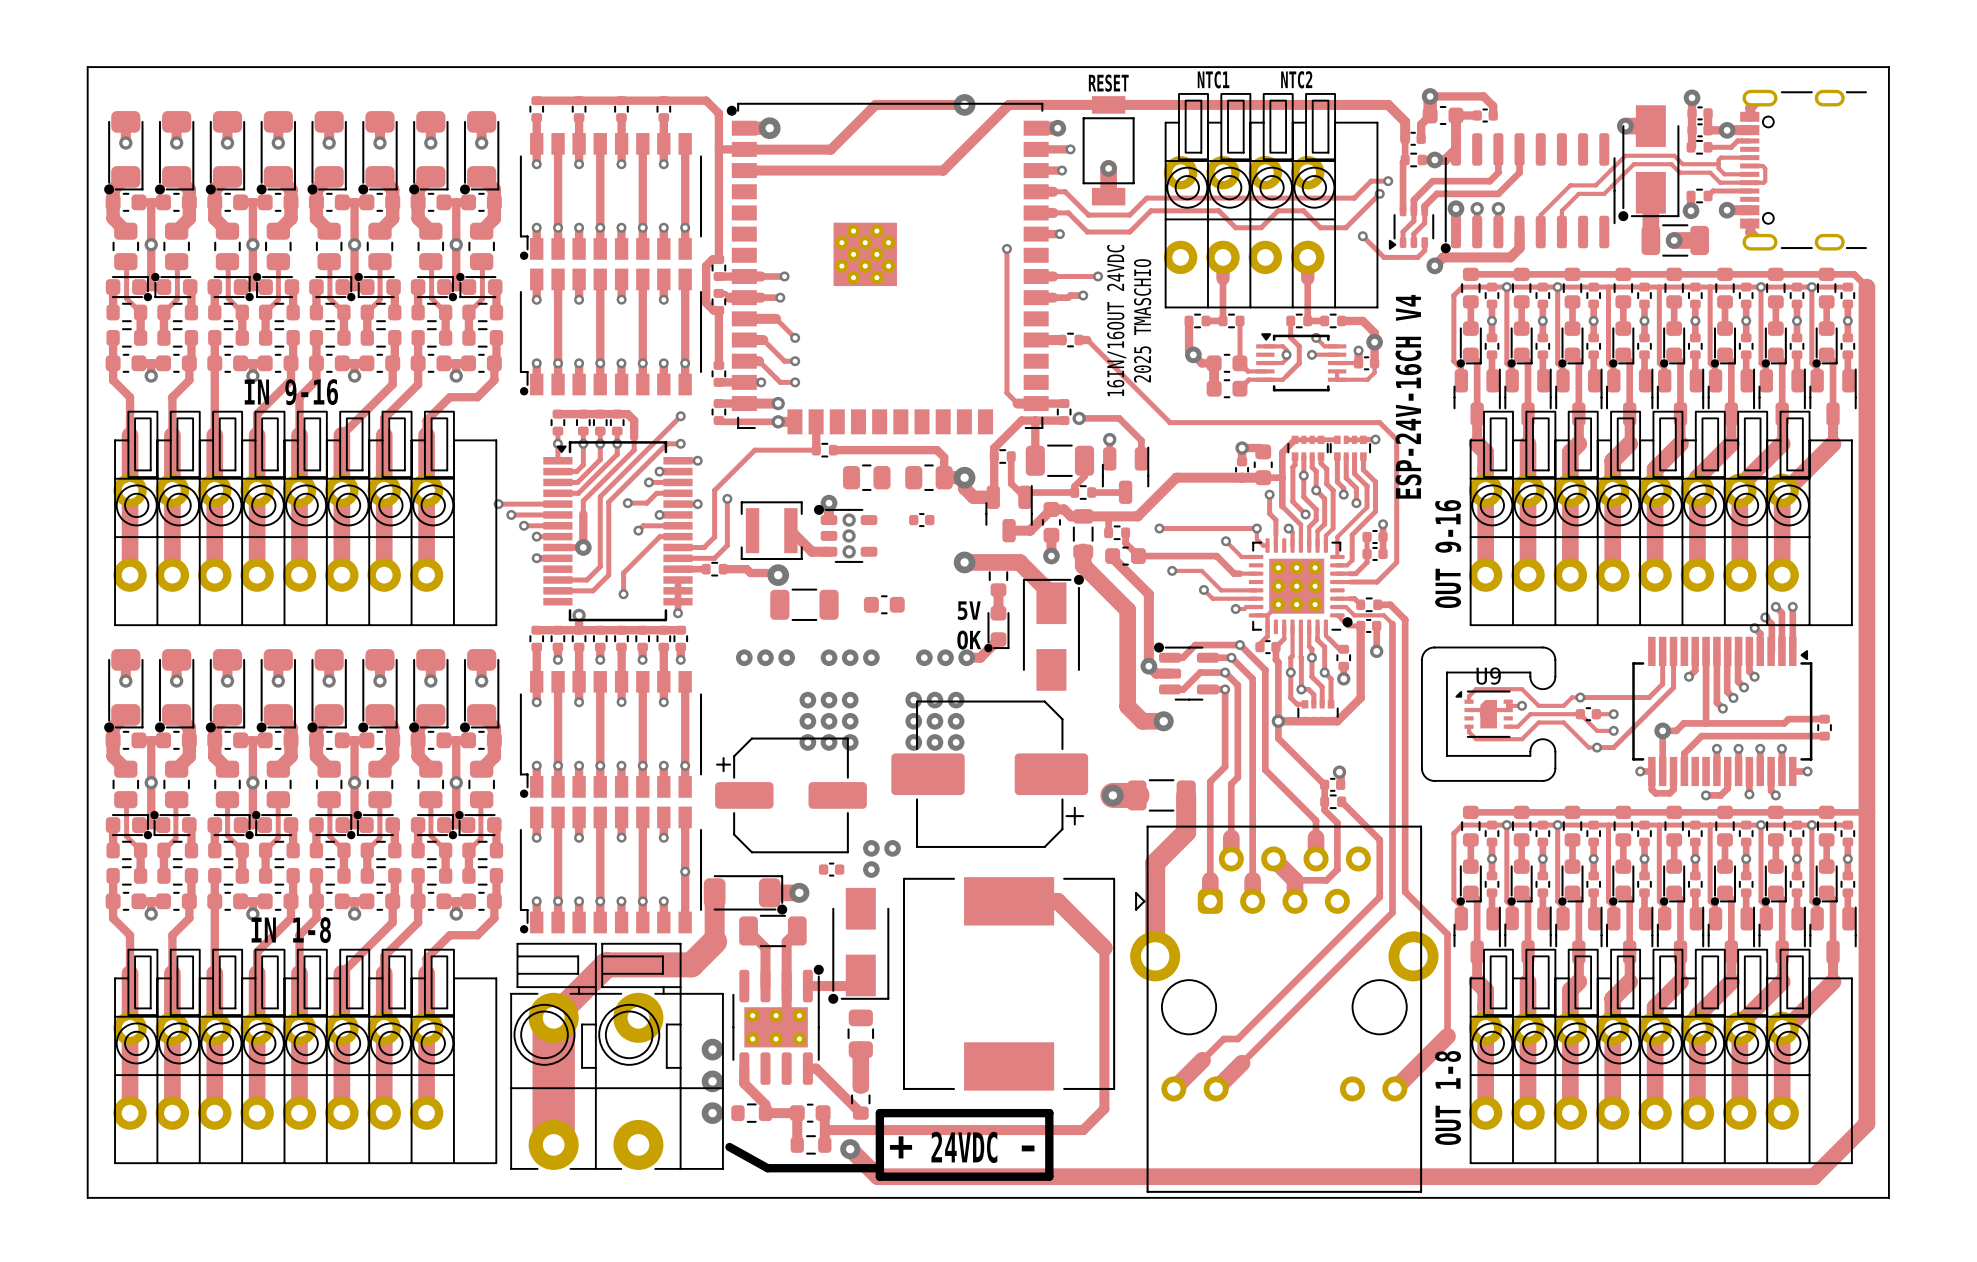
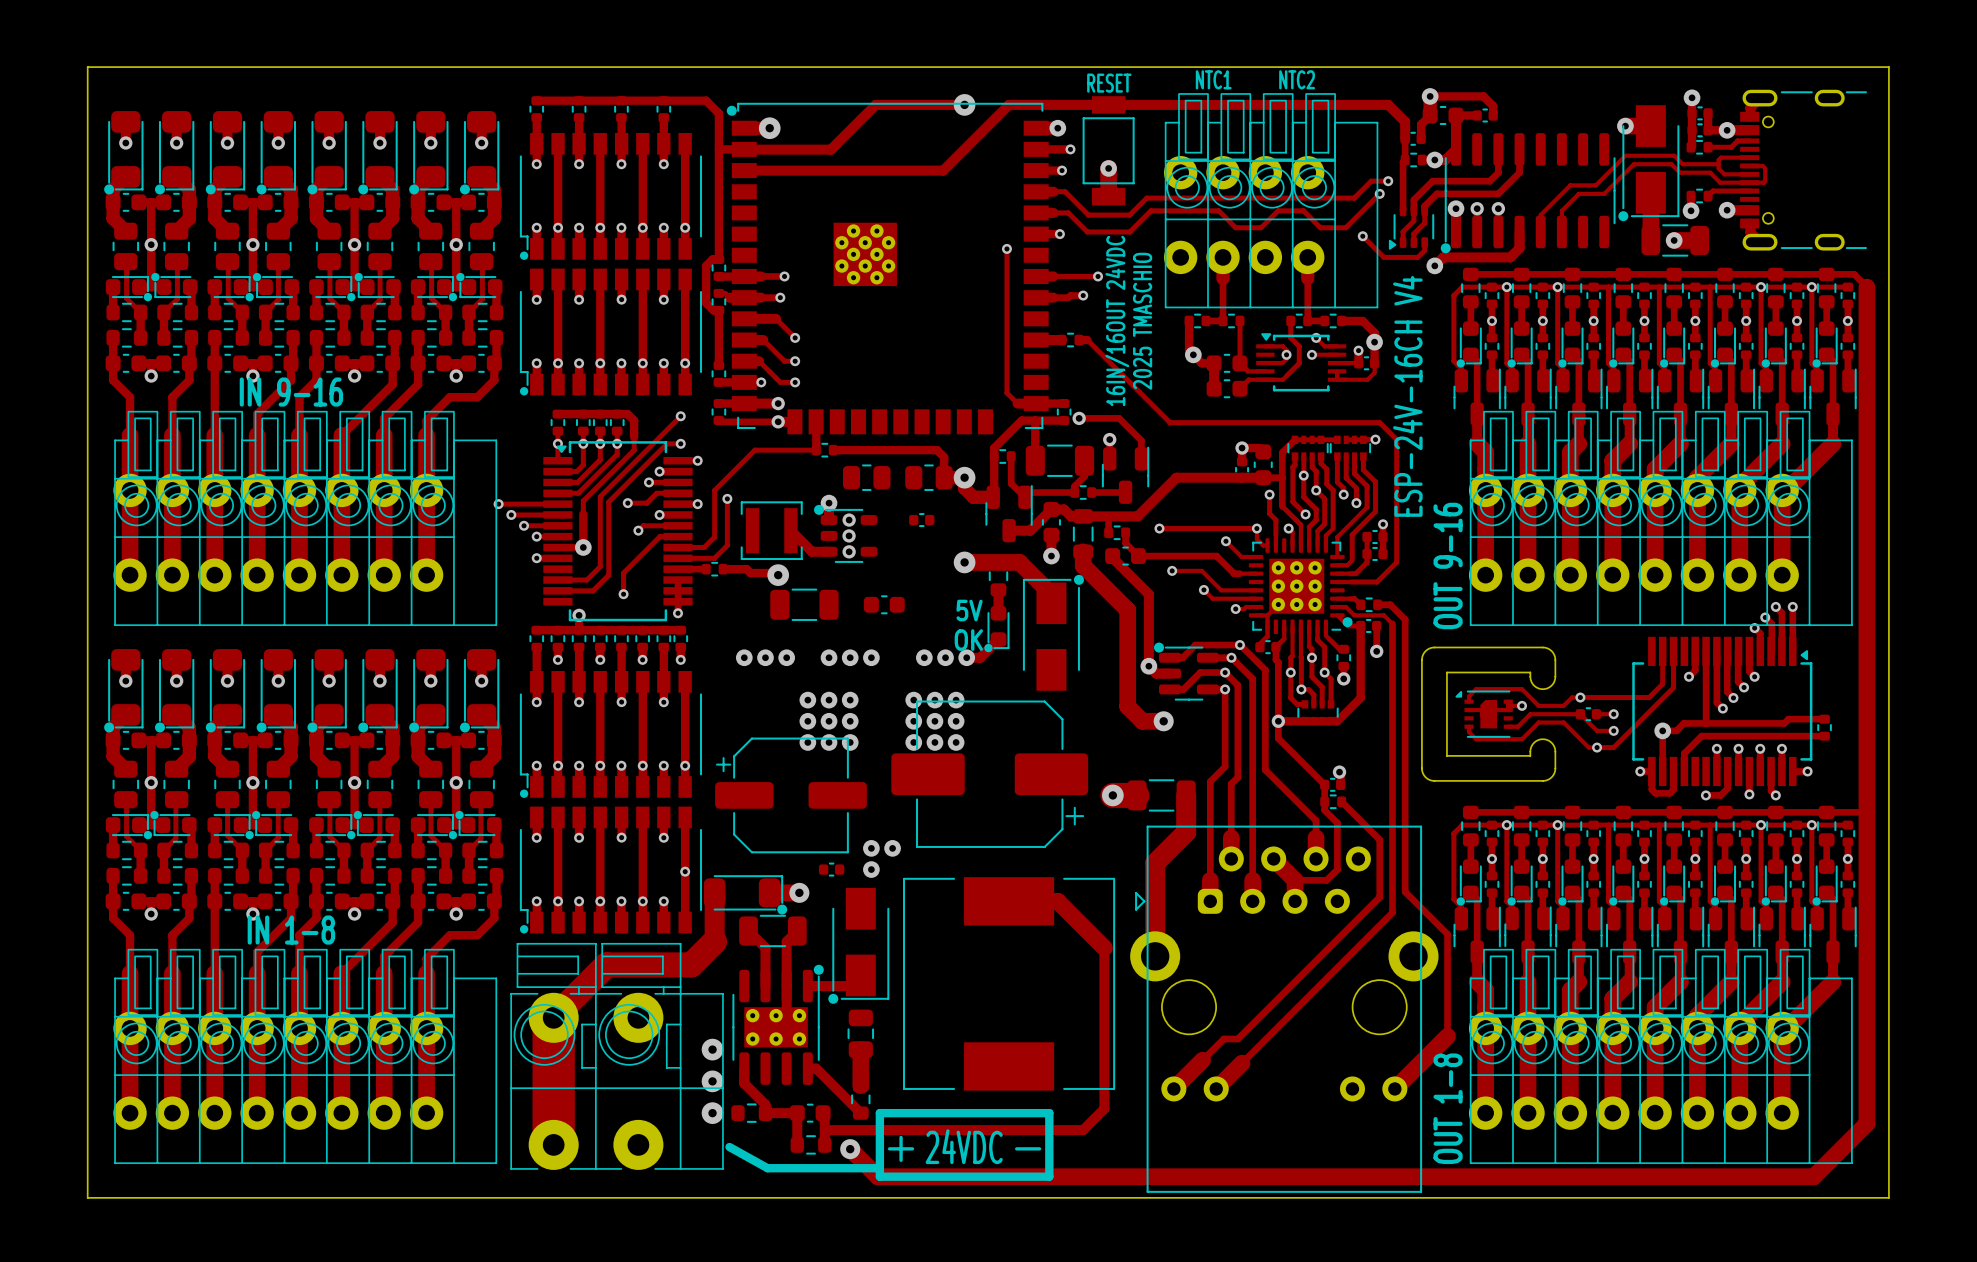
U9 name: U9 (1488, 676) -> none

